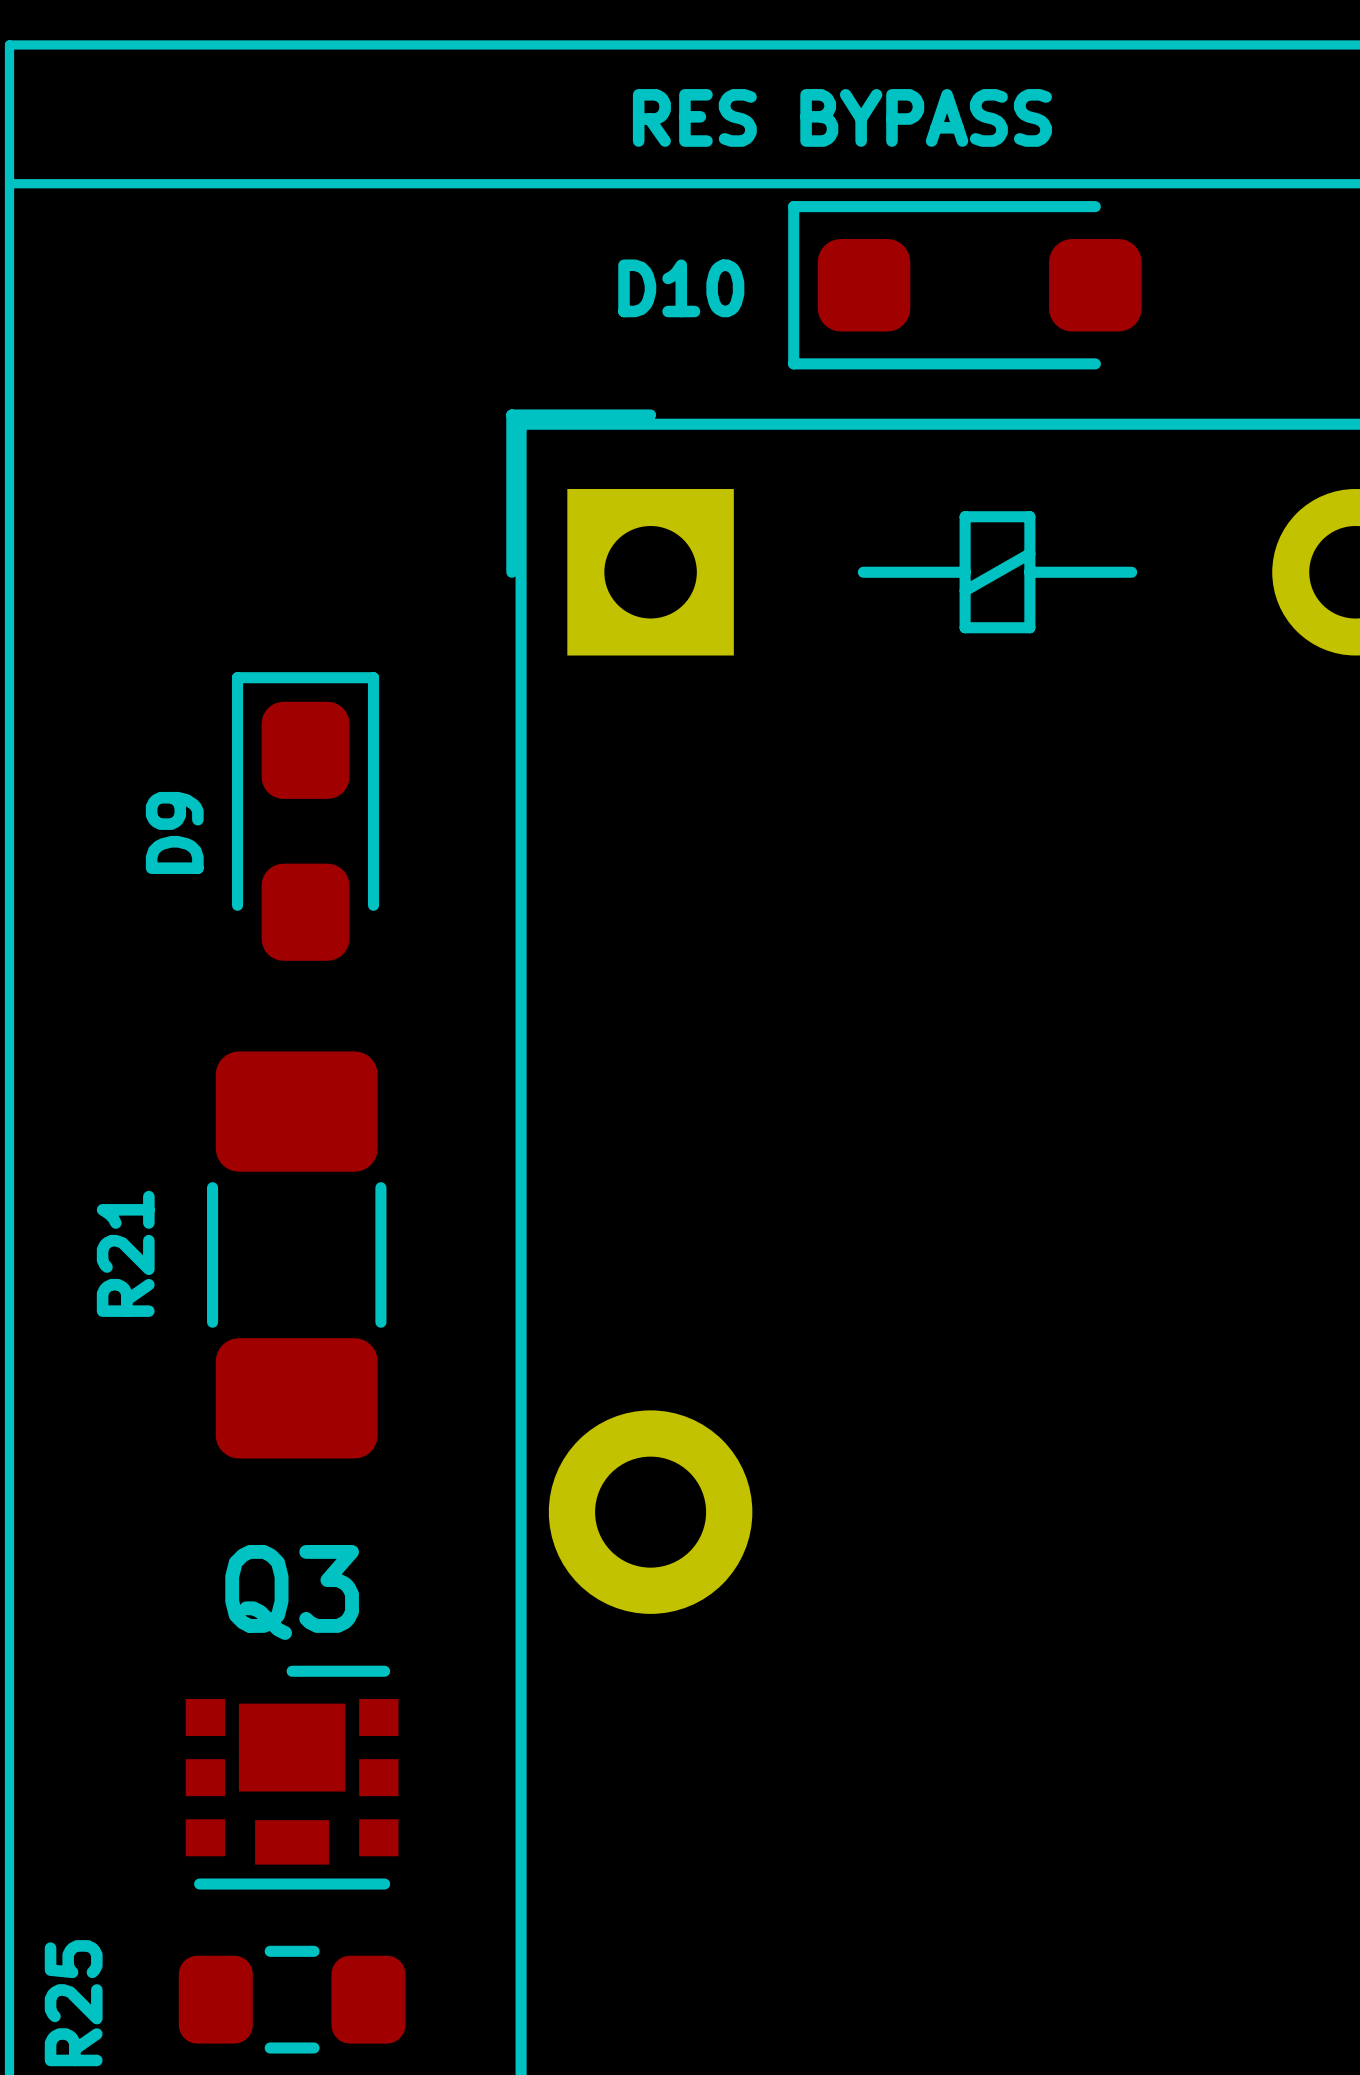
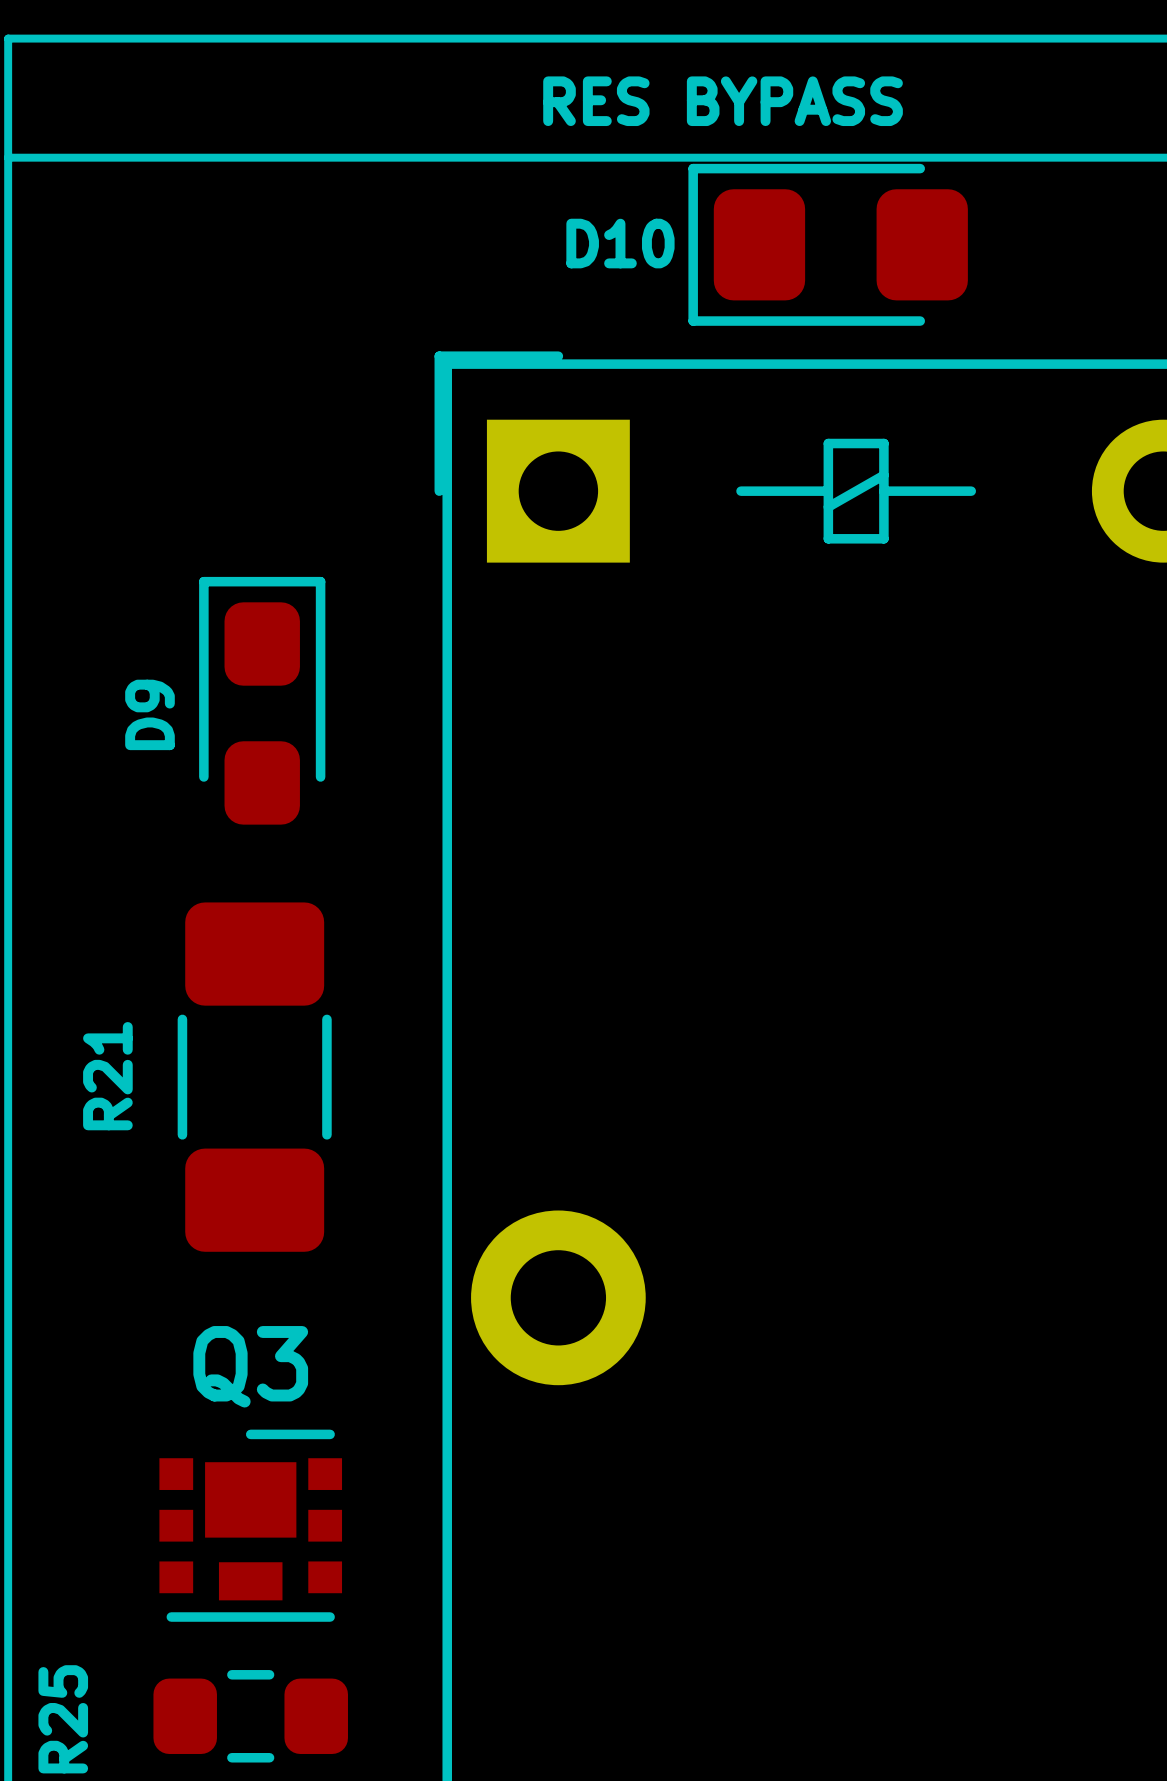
D10 footprint: [788, 201, 1142, 370] -> [688, 163, 968, 326]
D10 name position: D10 (681, 288) -> D10 (620, 243)

